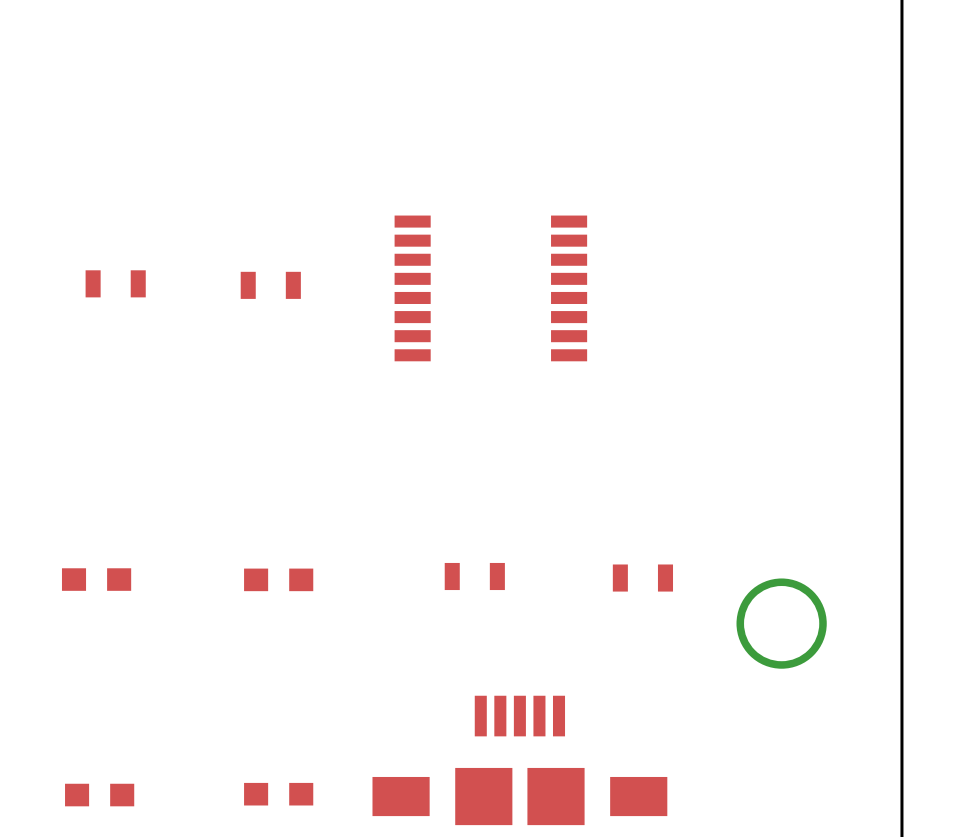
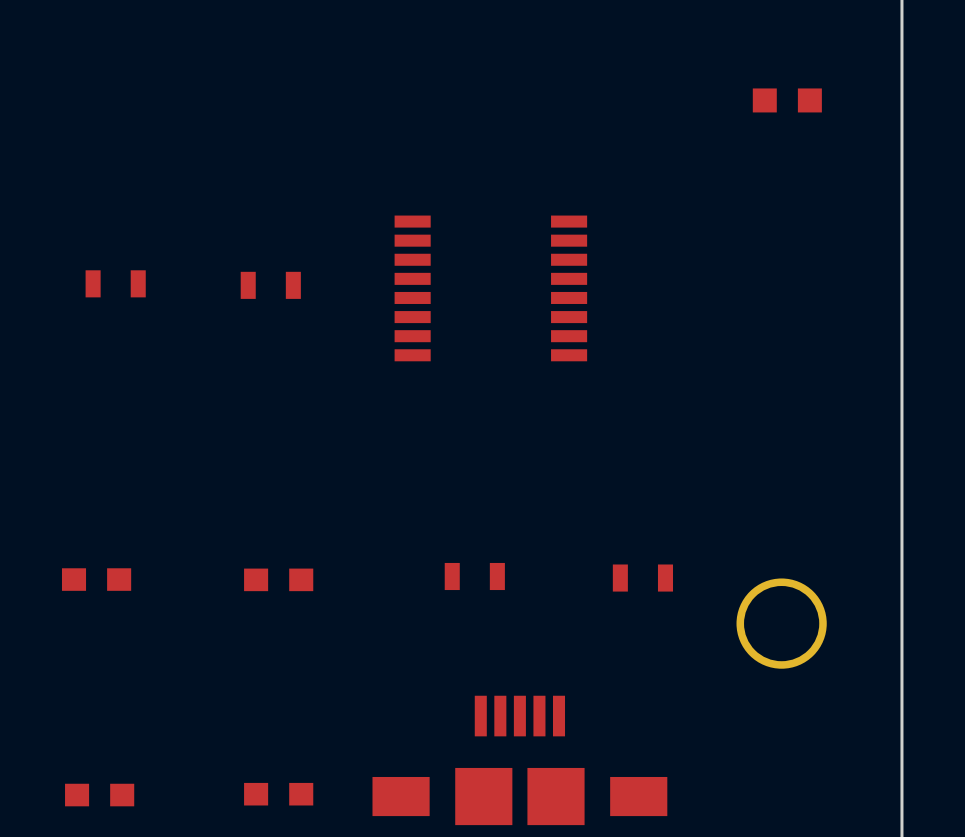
part: none -> (787, 100)

